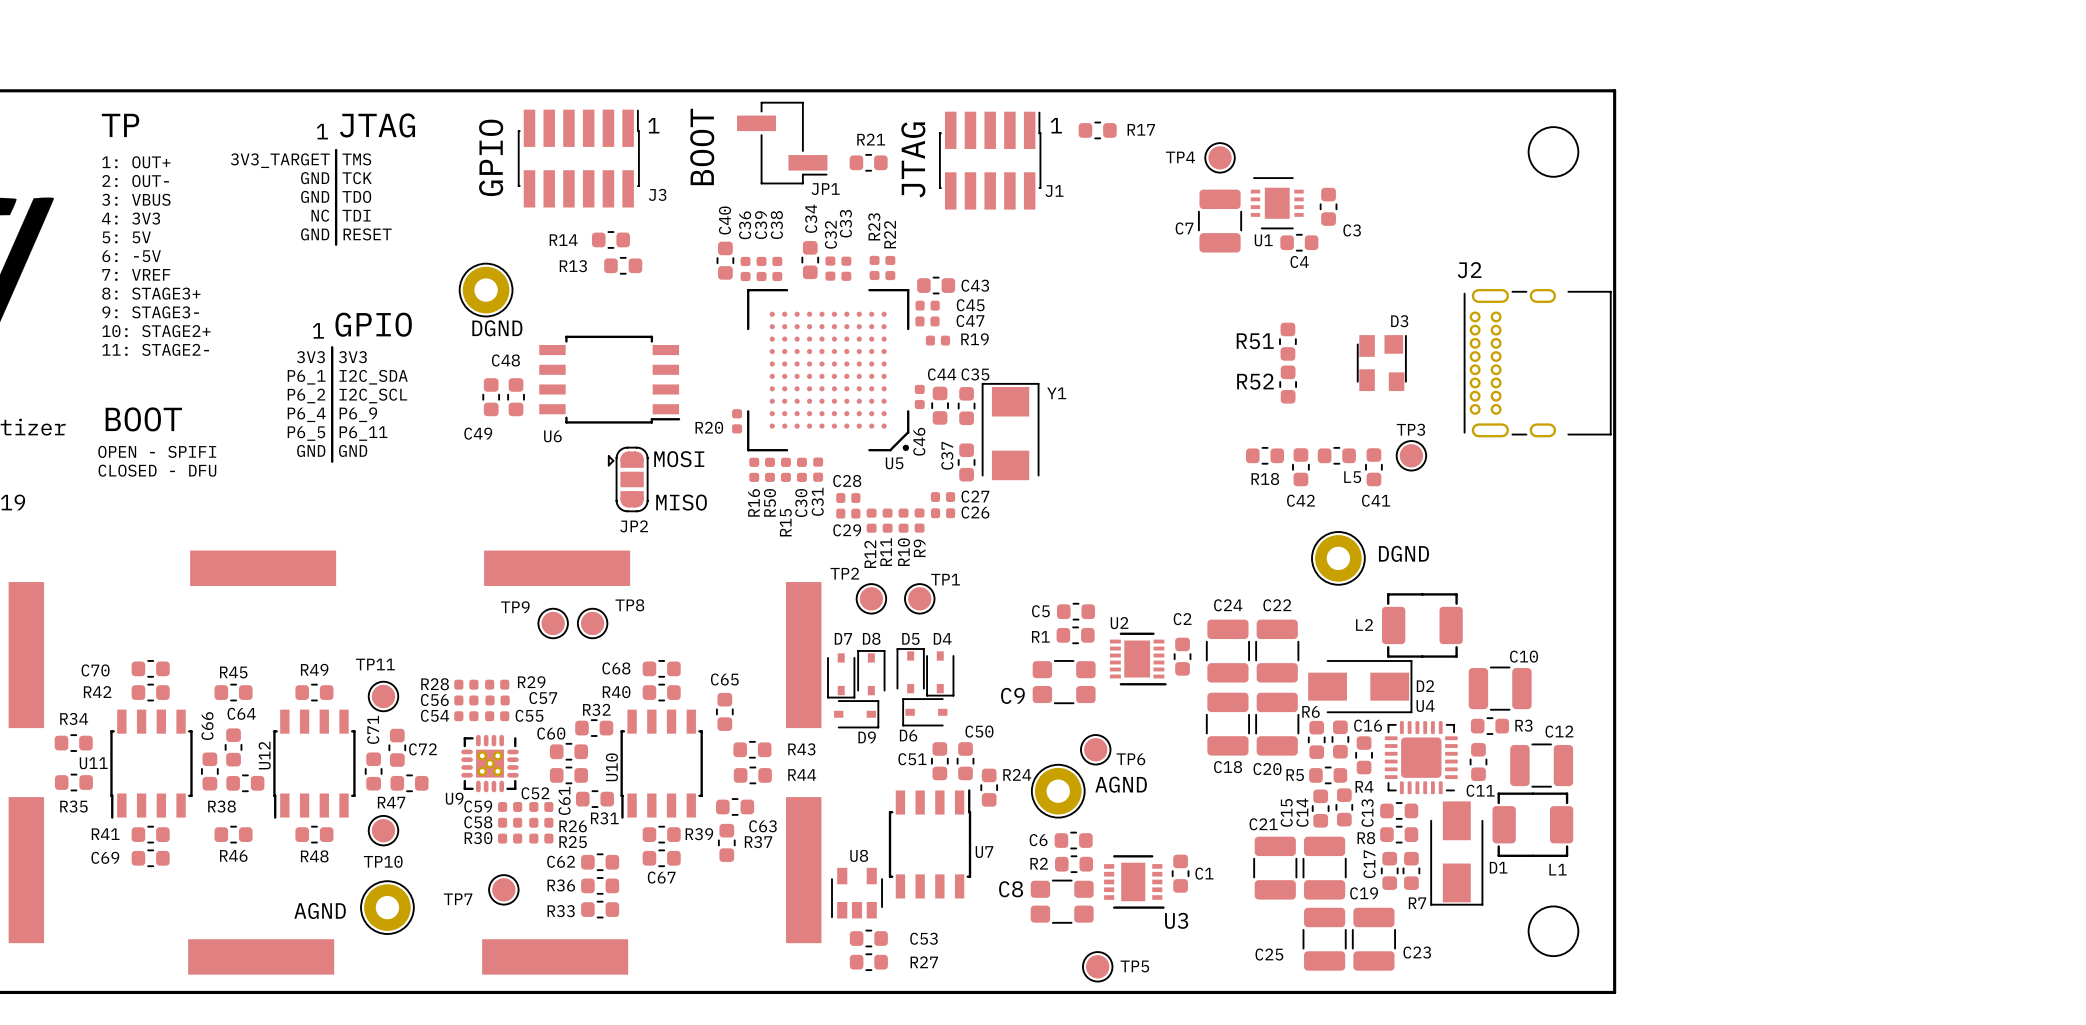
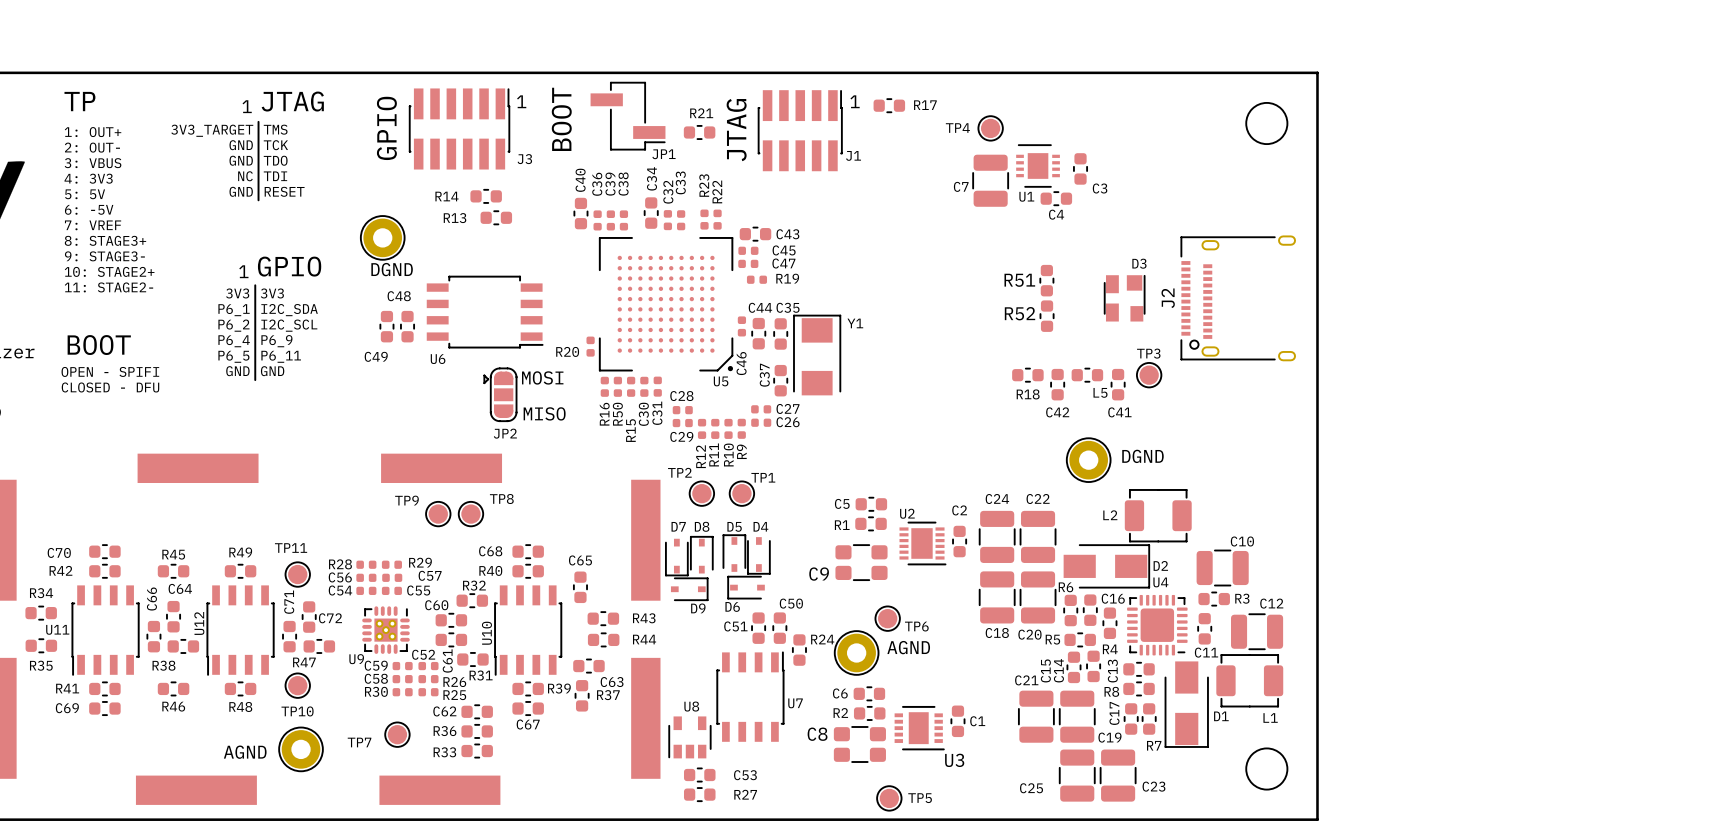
J2 name position: J2 (1469, 270) -> J2 (1168, 298)
J2 footprint: [1463, 288, 1612, 438] -> [1180, 235, 1297, 362]

